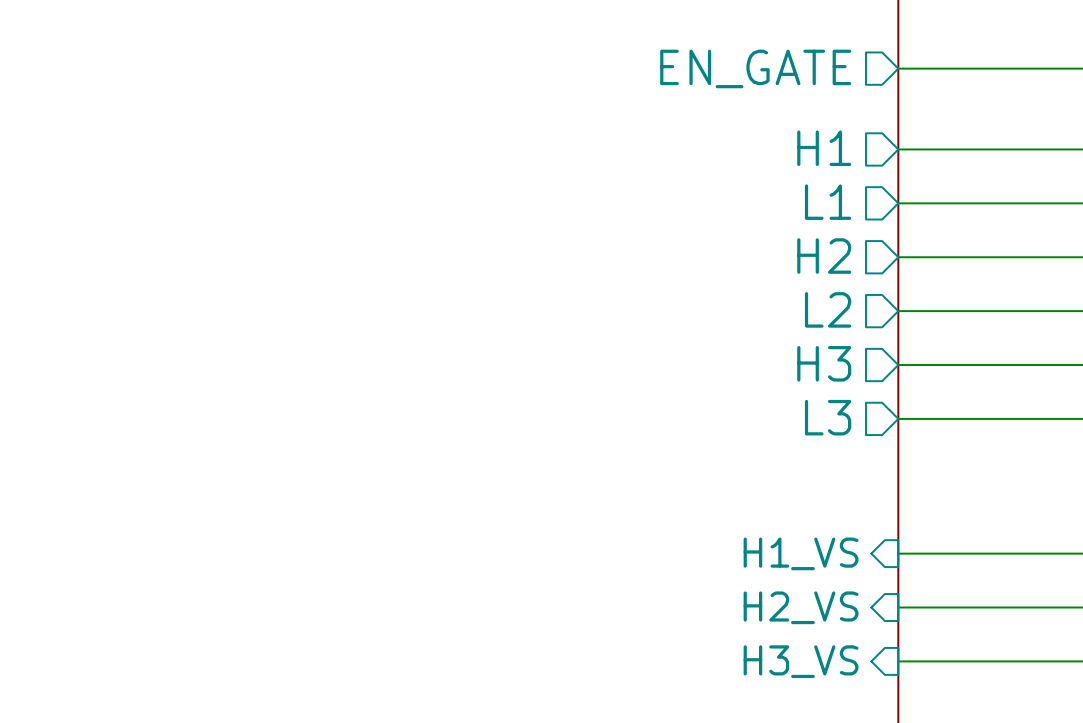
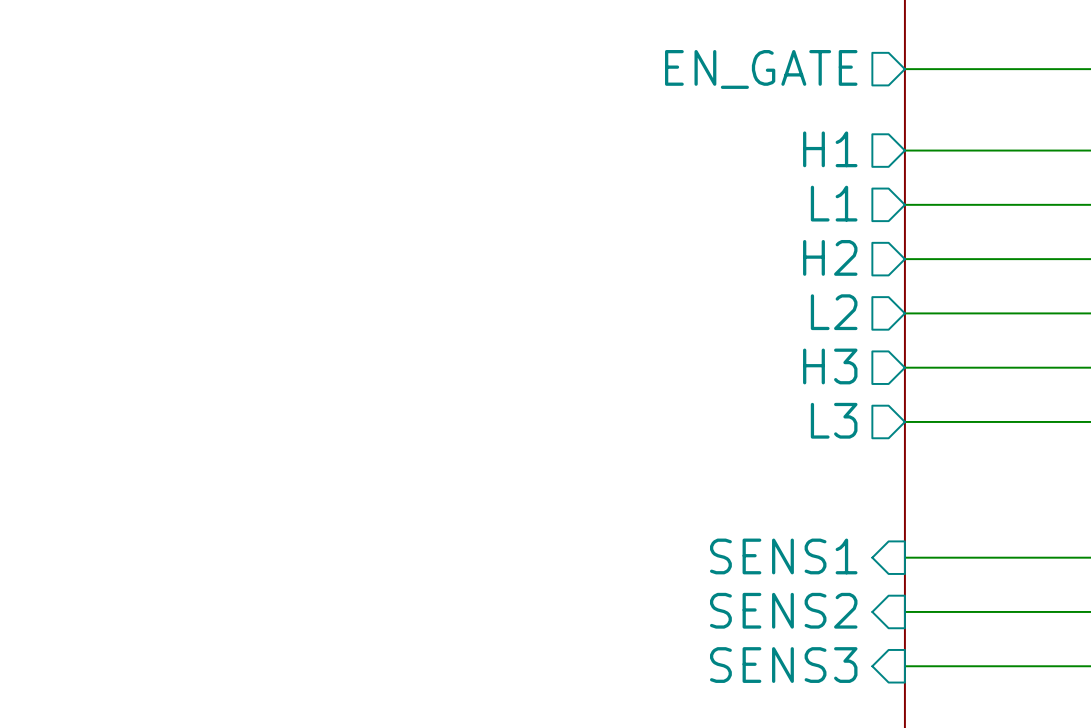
sheet pin: H1_VS (801, 553) -> SENS1 (783, 556)
sheet pin: H2_VS (801, 607) -> SENS2 (783, 610)
sheet pin: H3_VS (801, 661) -> SENS3 (783, 665)

